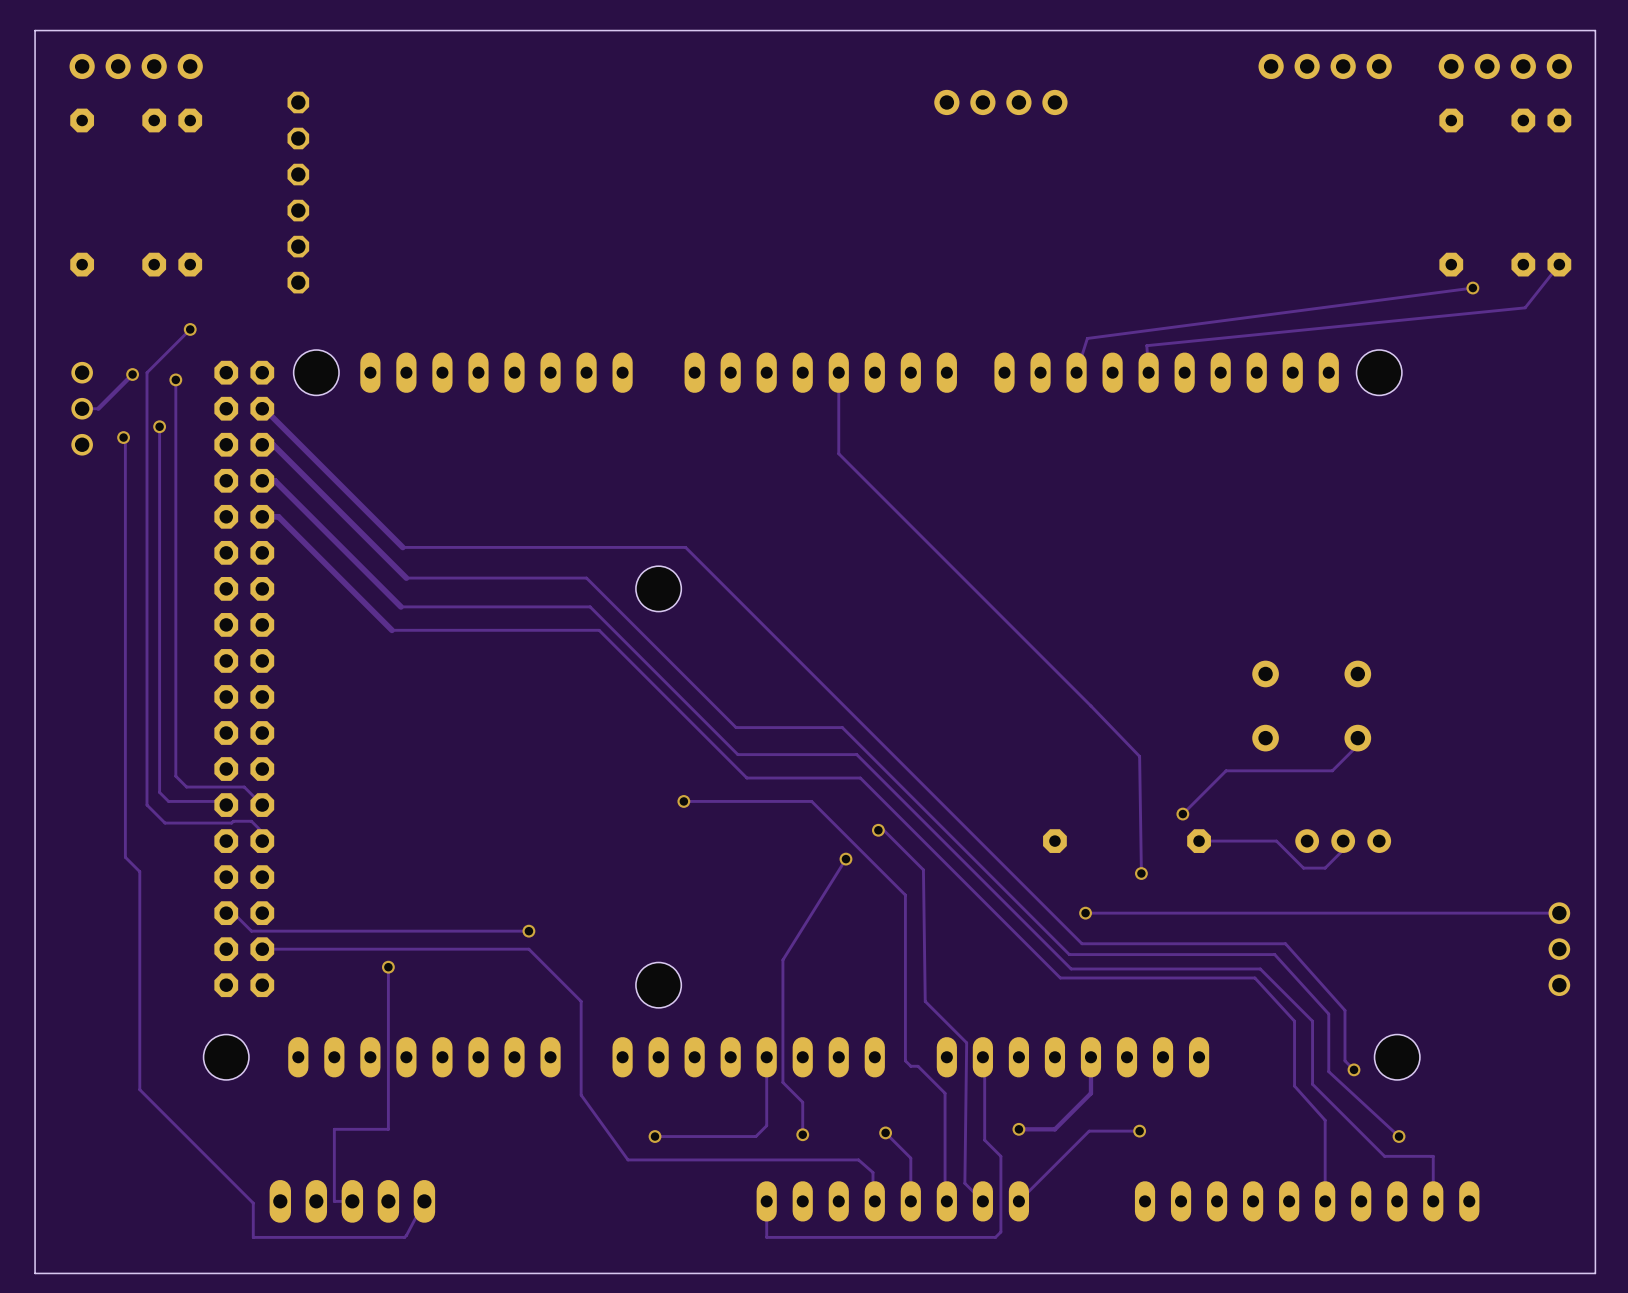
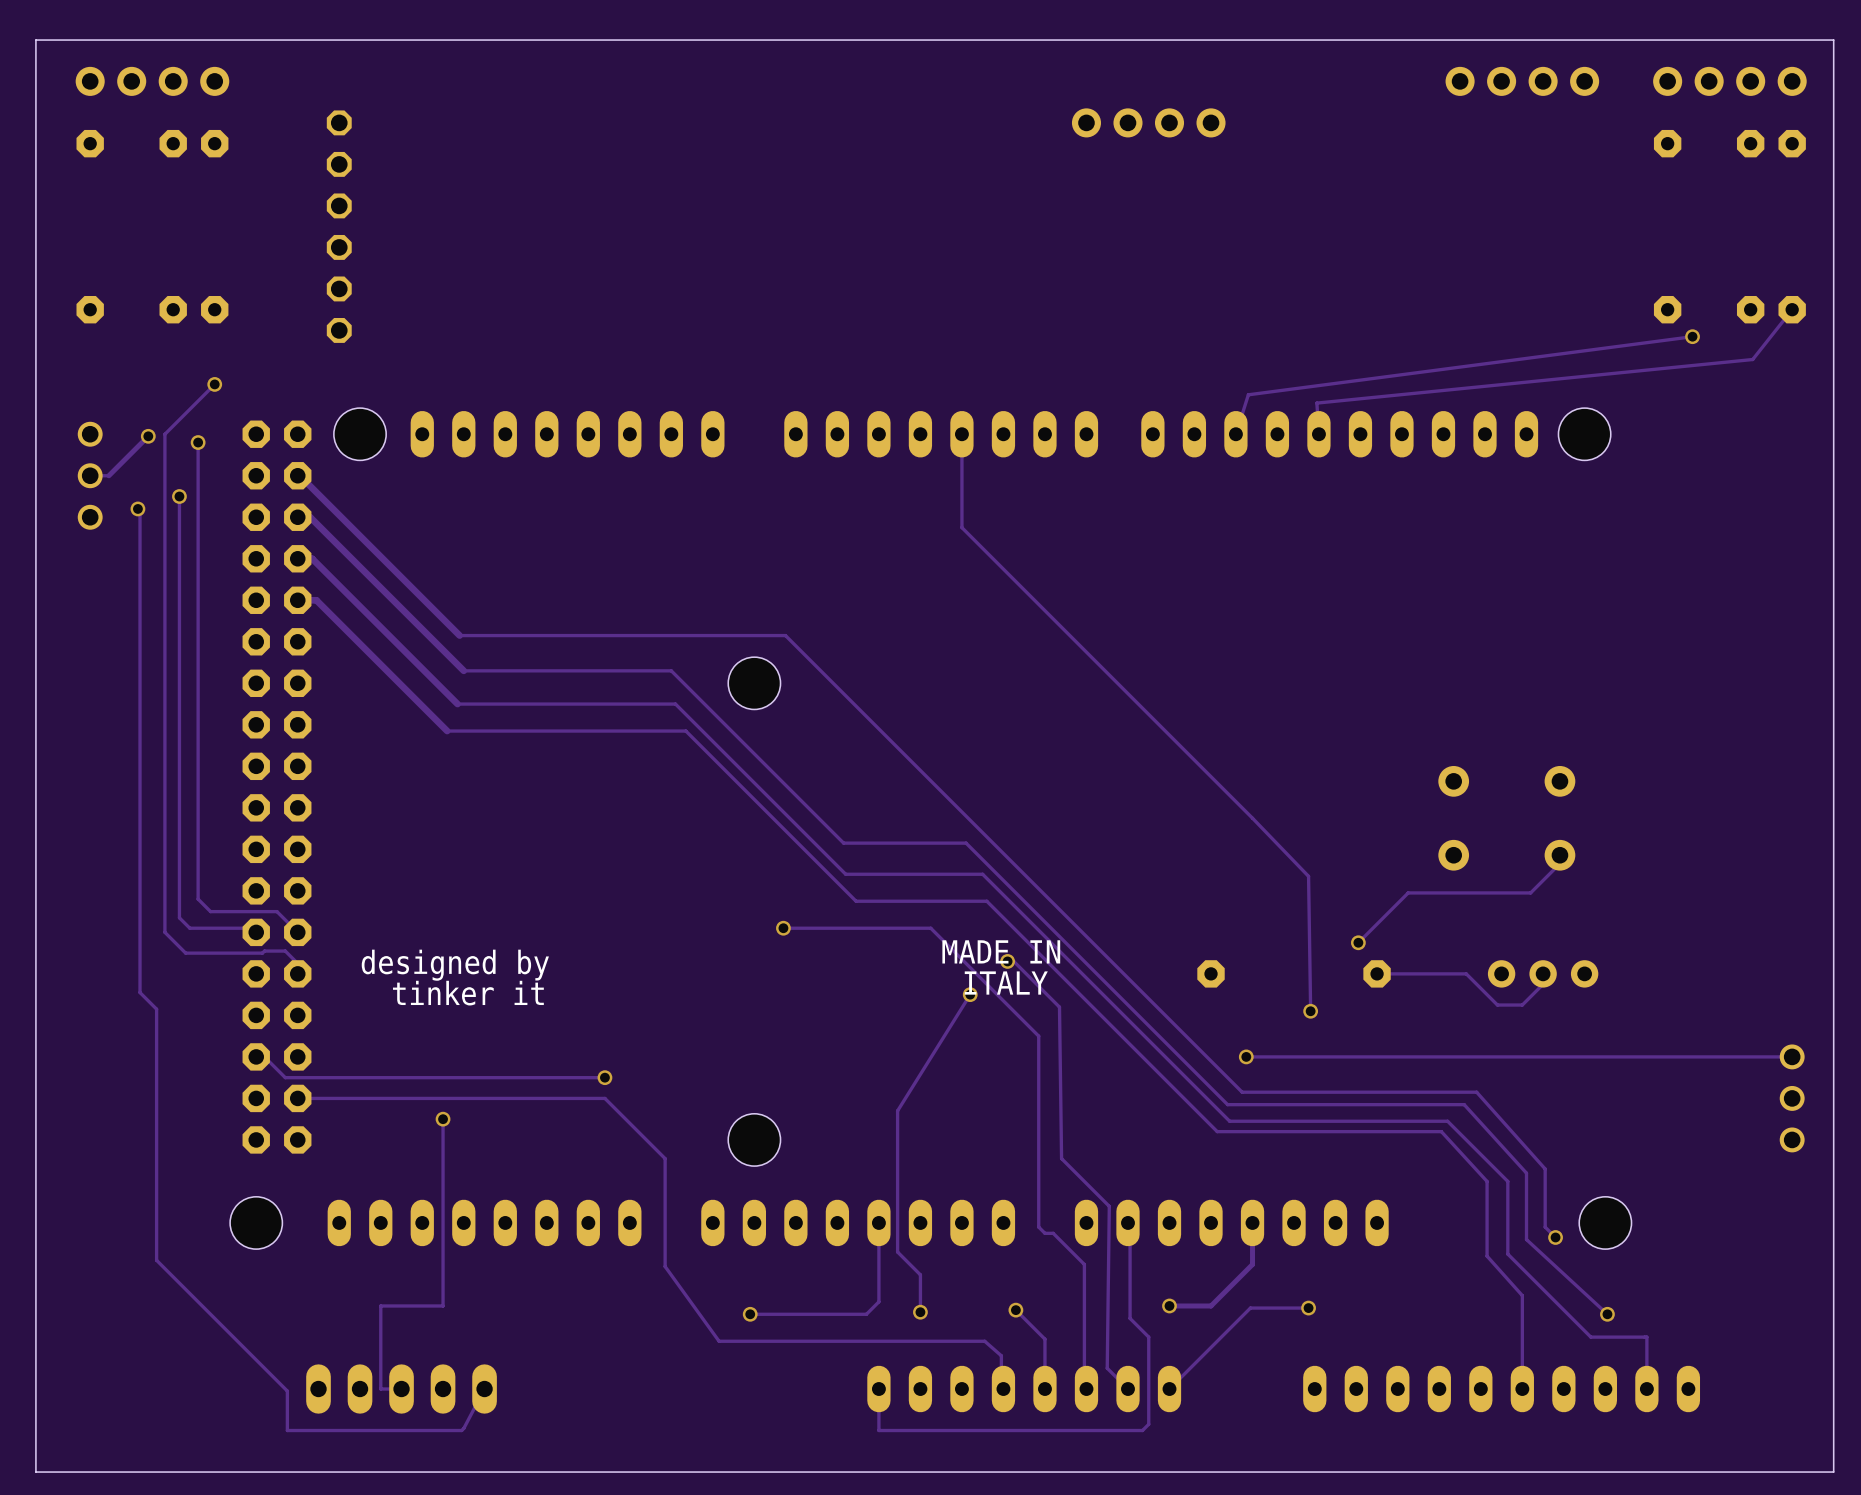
text: none -> MADE IN (1001, 951)
text: none -> designed by (455, 965)
text: none -> ITALY (1006, 983)
text: none -> tinker it (468, 993)

